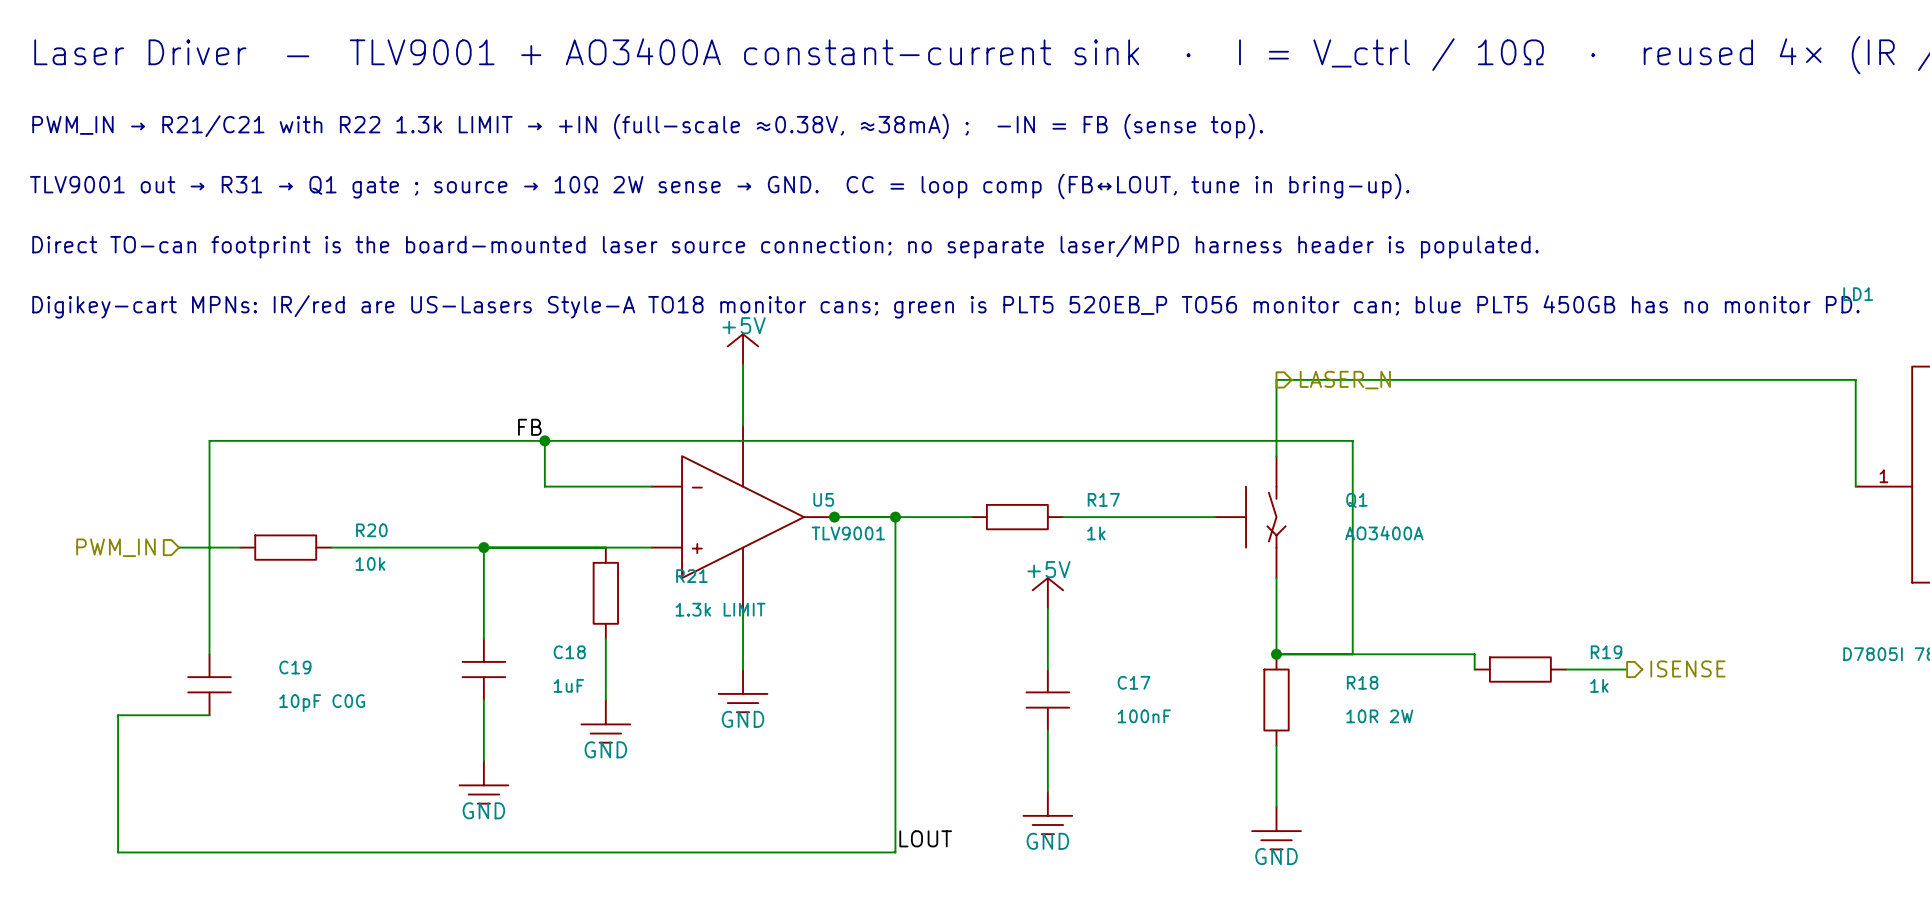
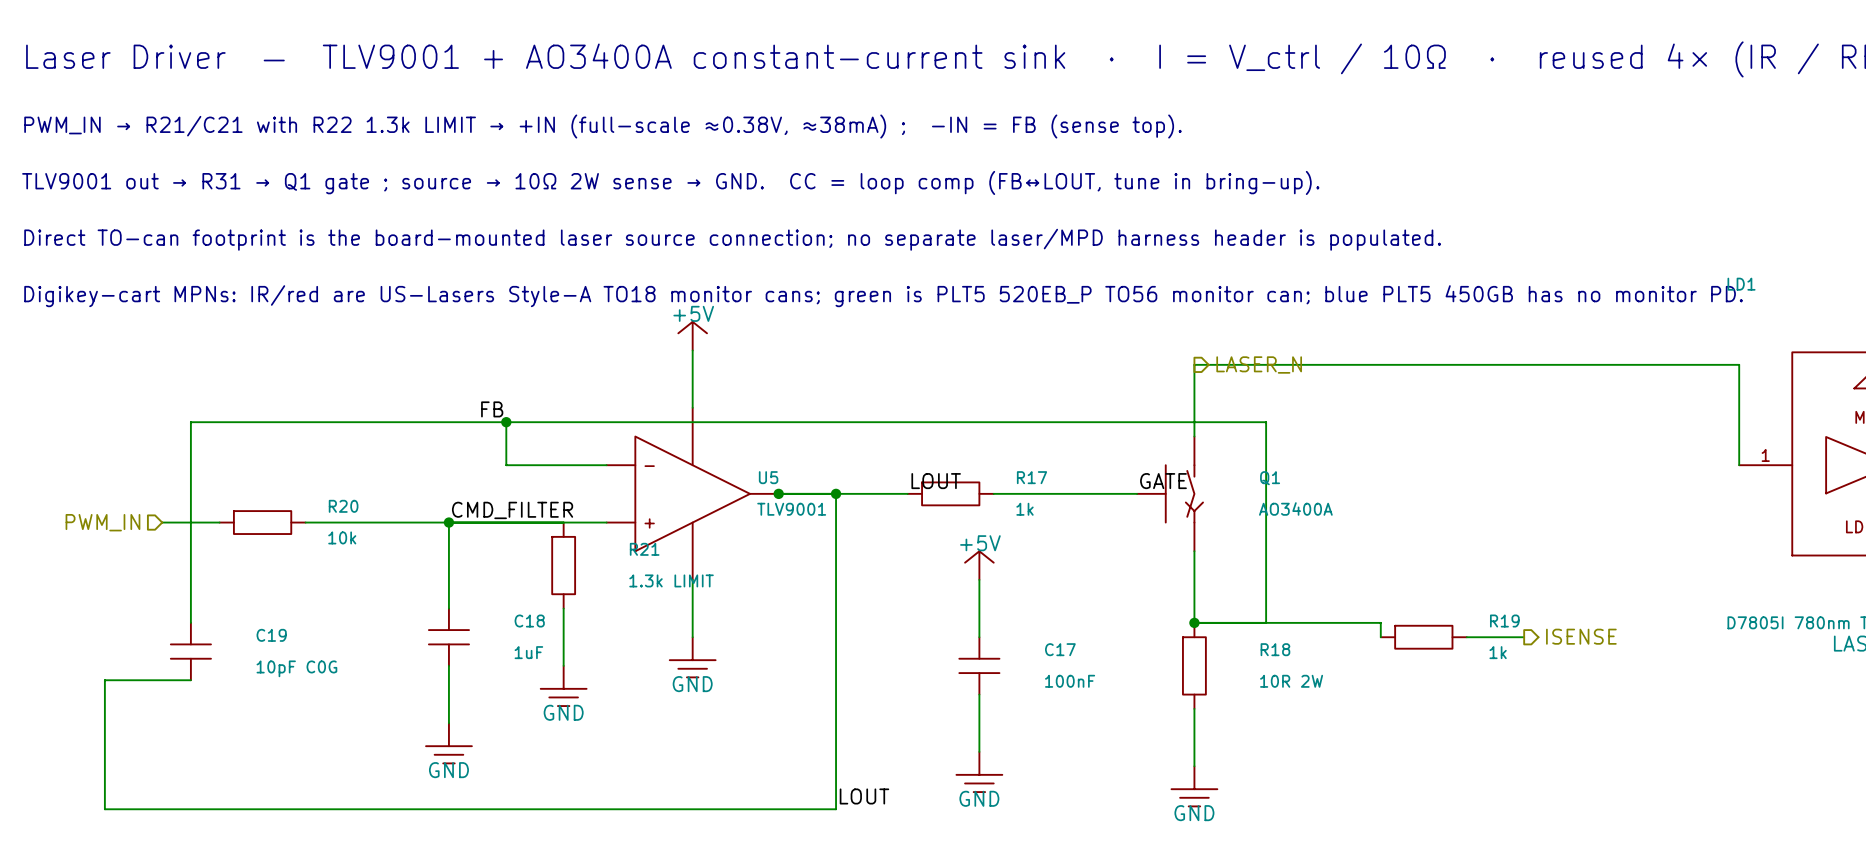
label: none -> LOUT (936, 481)
label: none -> GATE (1163, 481)
label: none -> CMD_FILTER (512, 510)

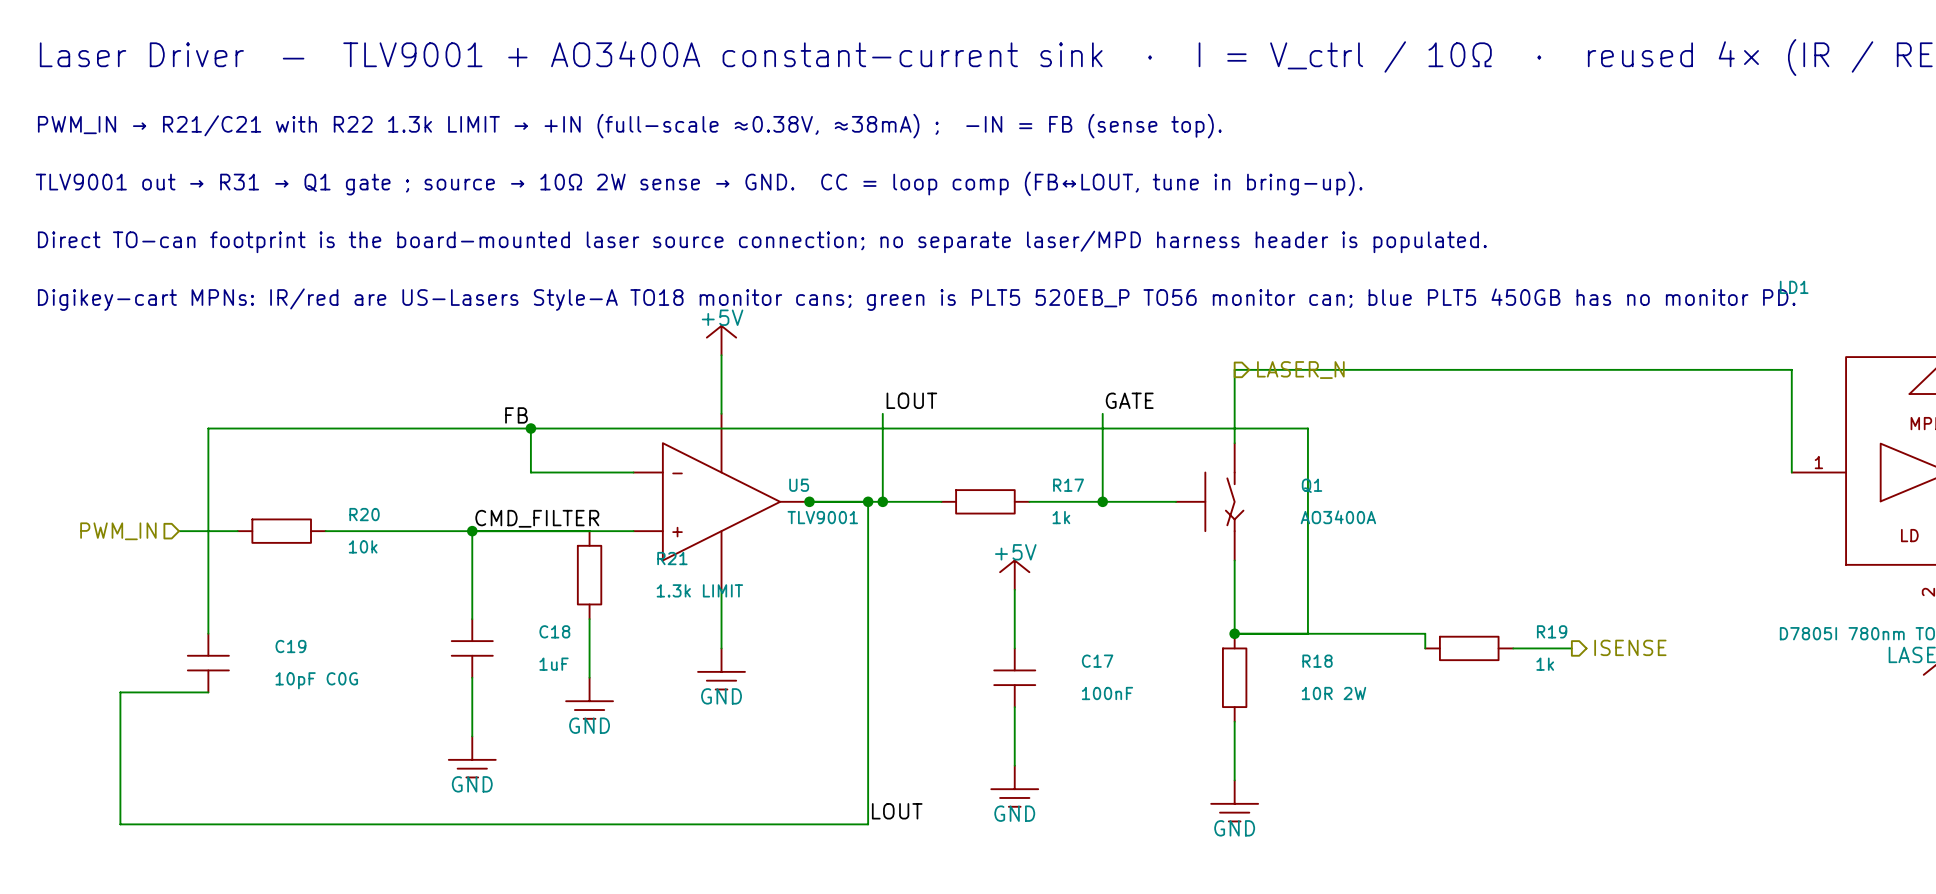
wire: none -> (882, 413) (882, 501)
wire: none -> (1102, 413) (1102, 501)
label position: LOUT (936, 481) -> LOUT (911, 400)
label position: GATE (1163, 481) -> GATE (1129, 400)
junction: none -> (882, 501)
junction: none -> (1102, 501)

